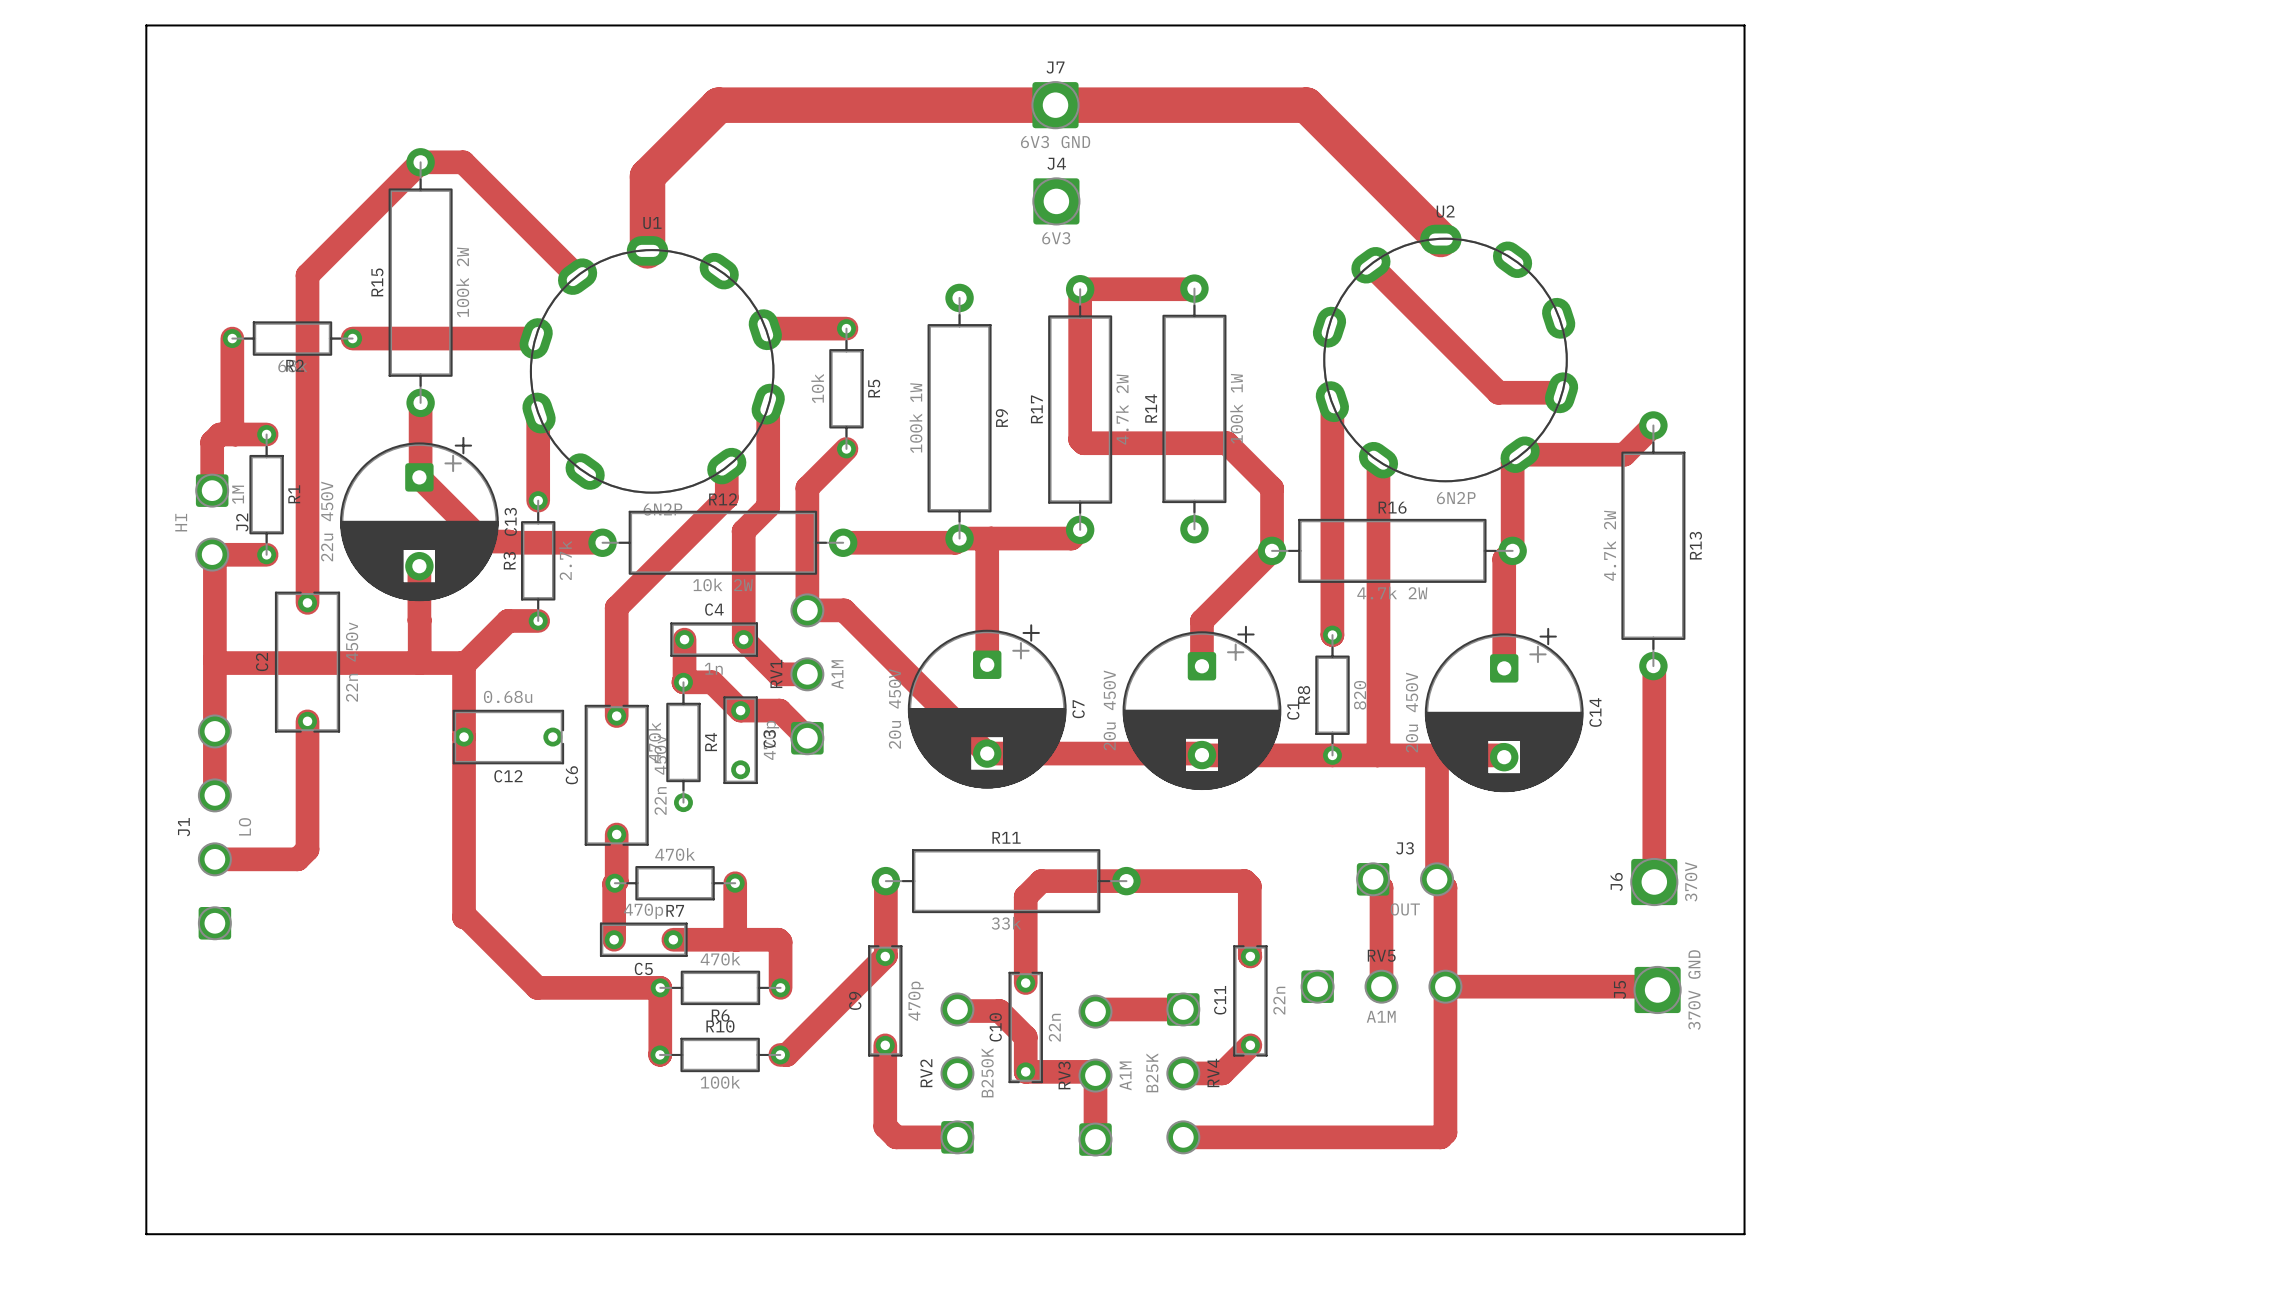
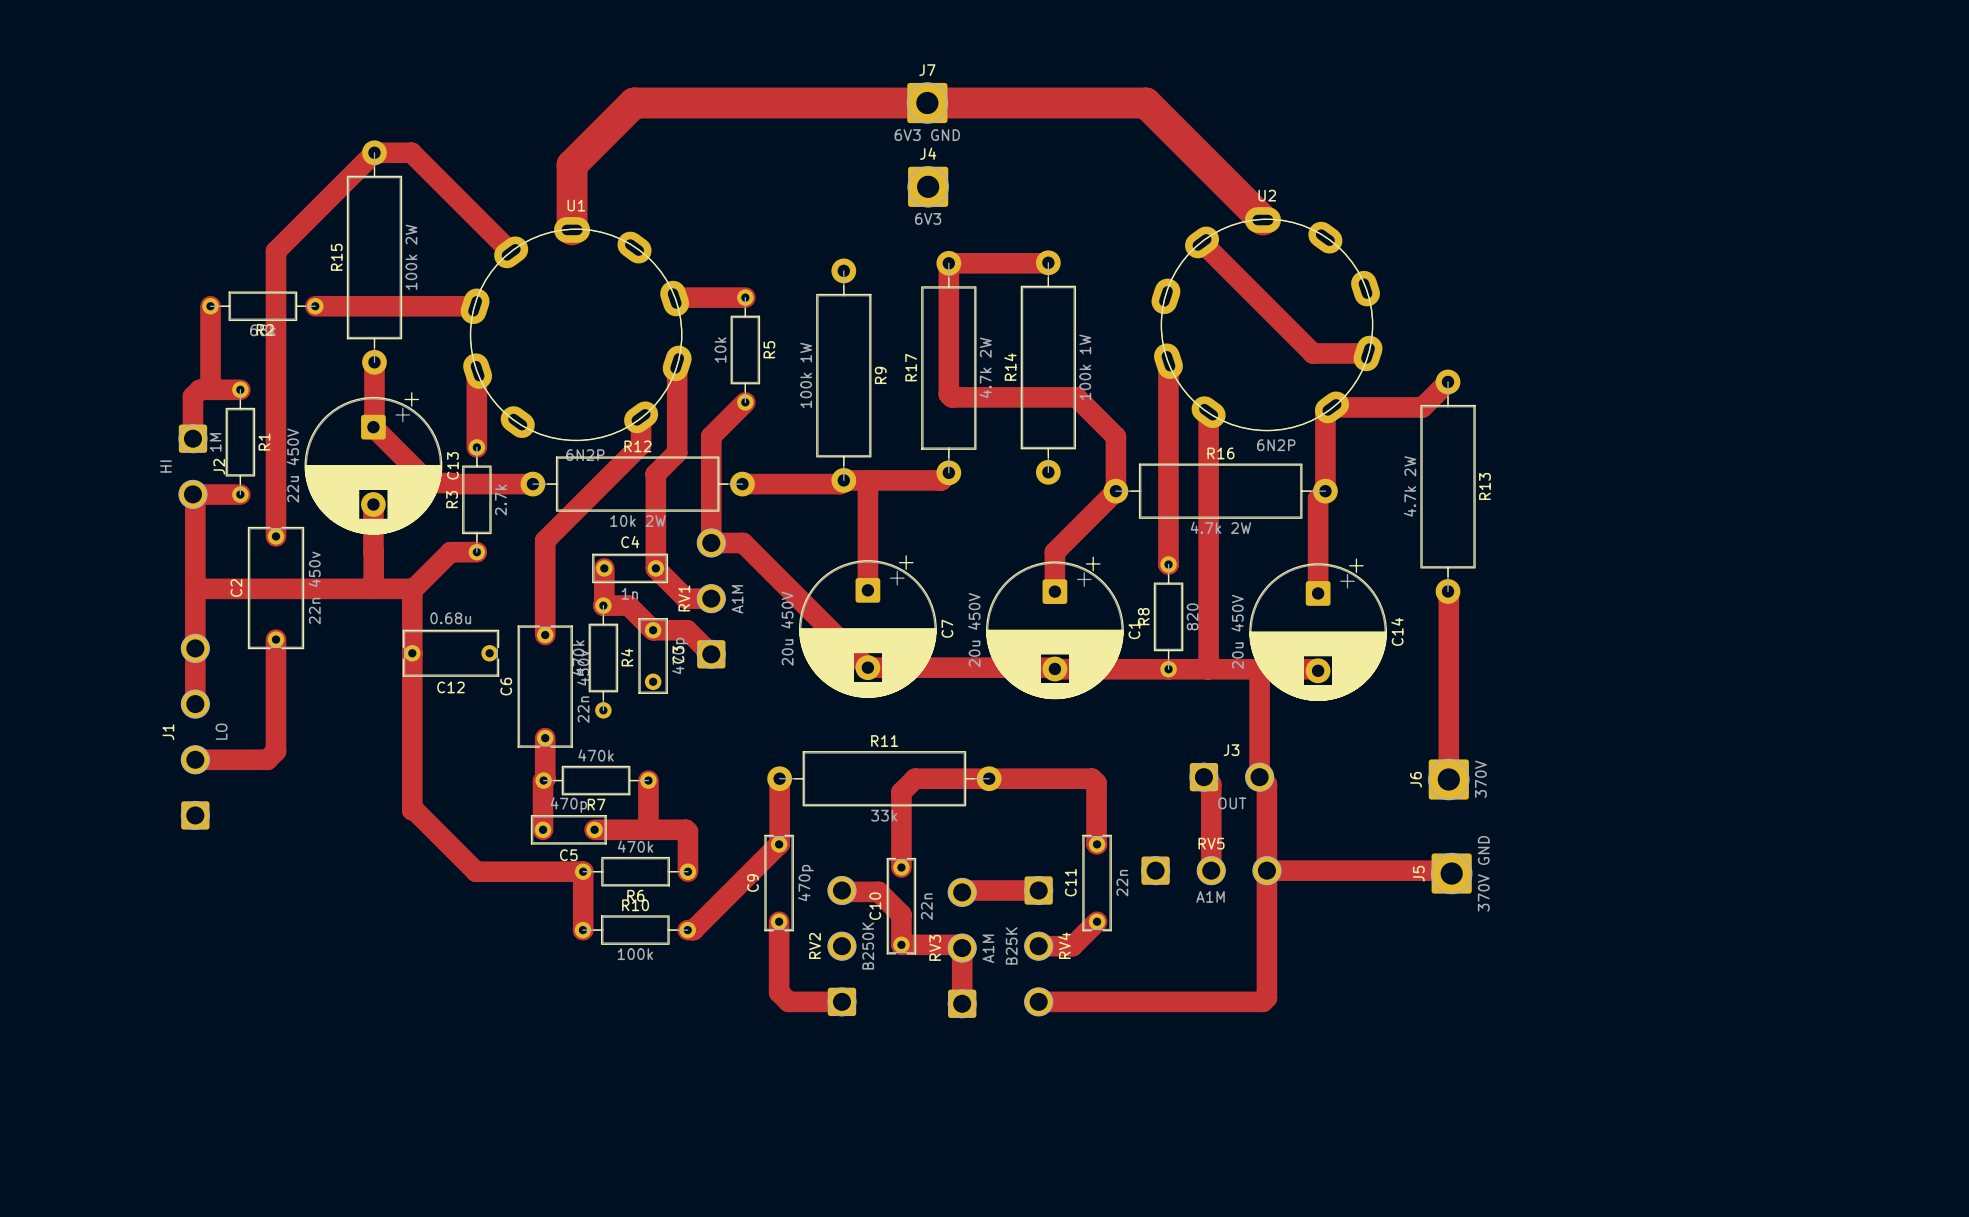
board edge: (146, 25) (1744, 25) (1744, 1234) (146, 1234) (146, 25) -> none

